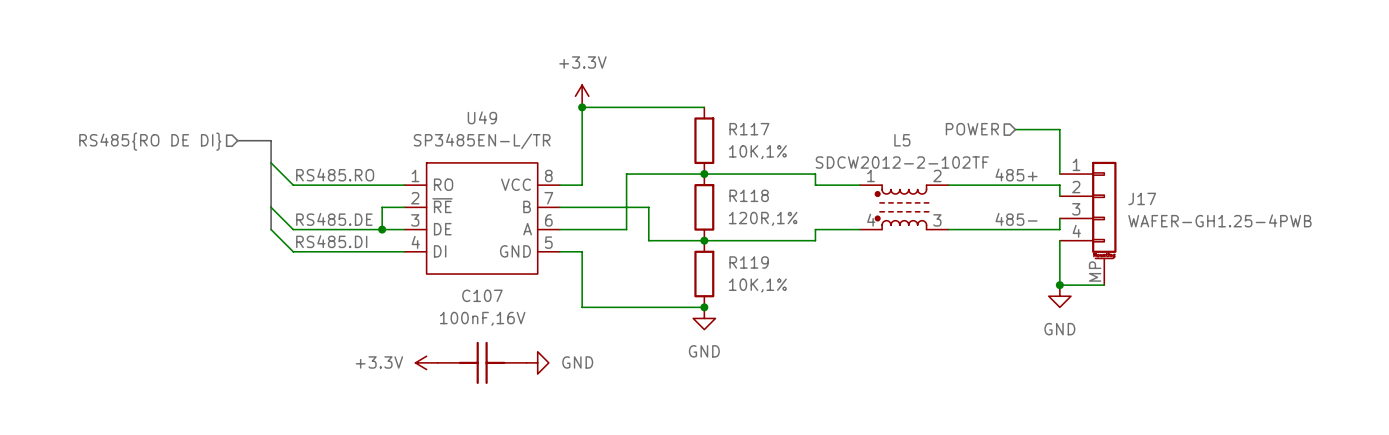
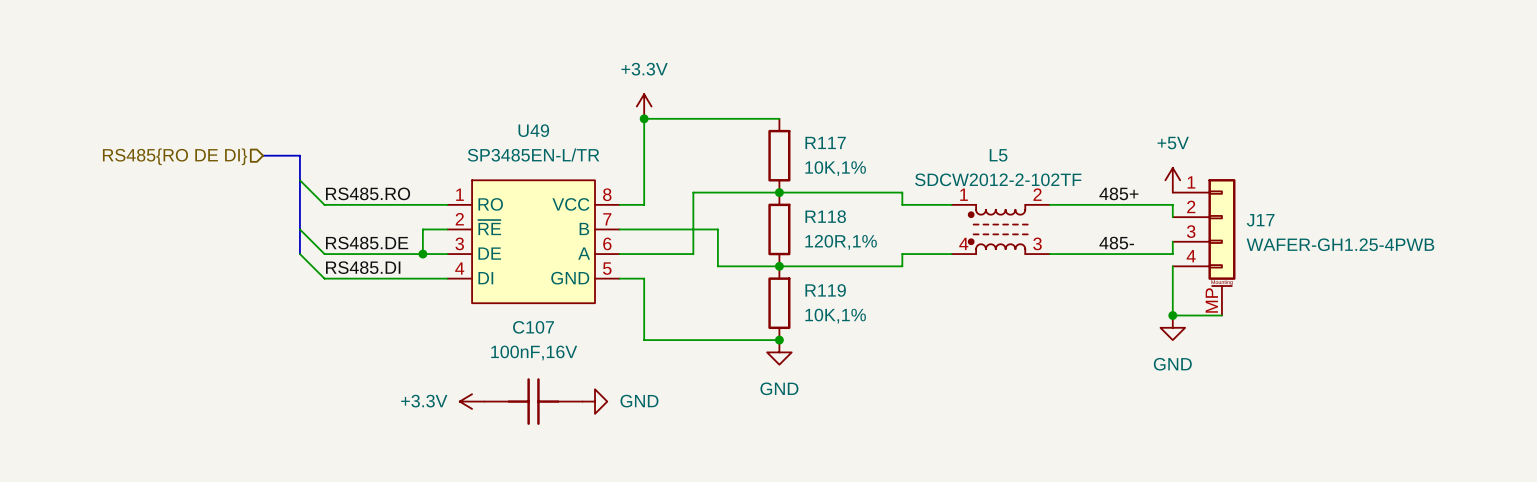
hierarchical label: POWER (972, 129) -> none
wire: (1015, 129) (1059, 129) (1059, 174) -> none
power symbol: none -> +5V (1172, 180)

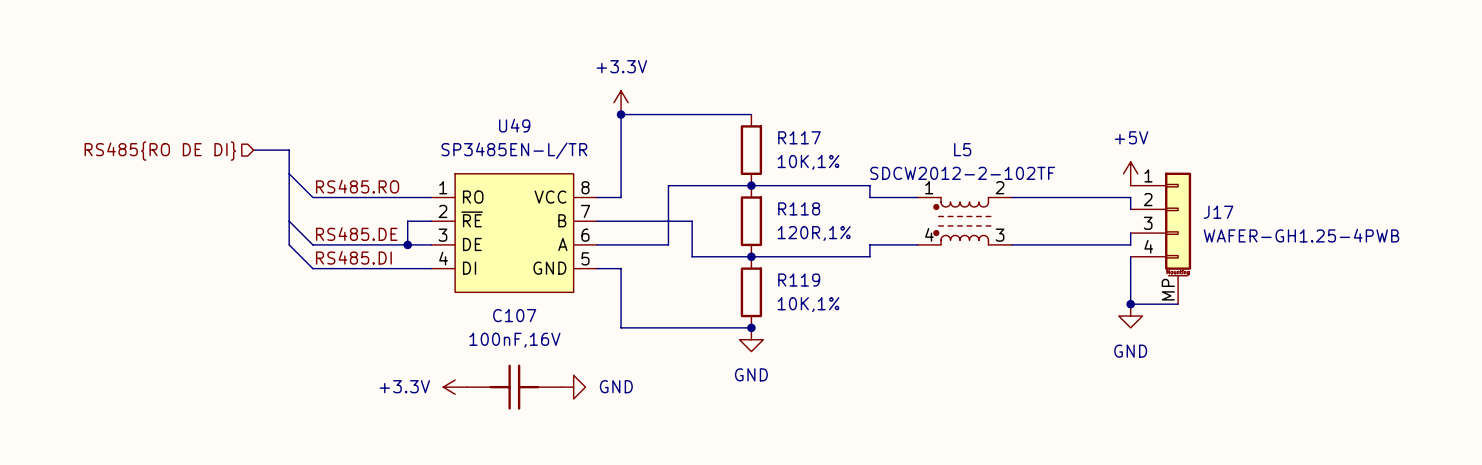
label: 485+ (1118, 193) -> none
label: 485- (1116, 243) -> none

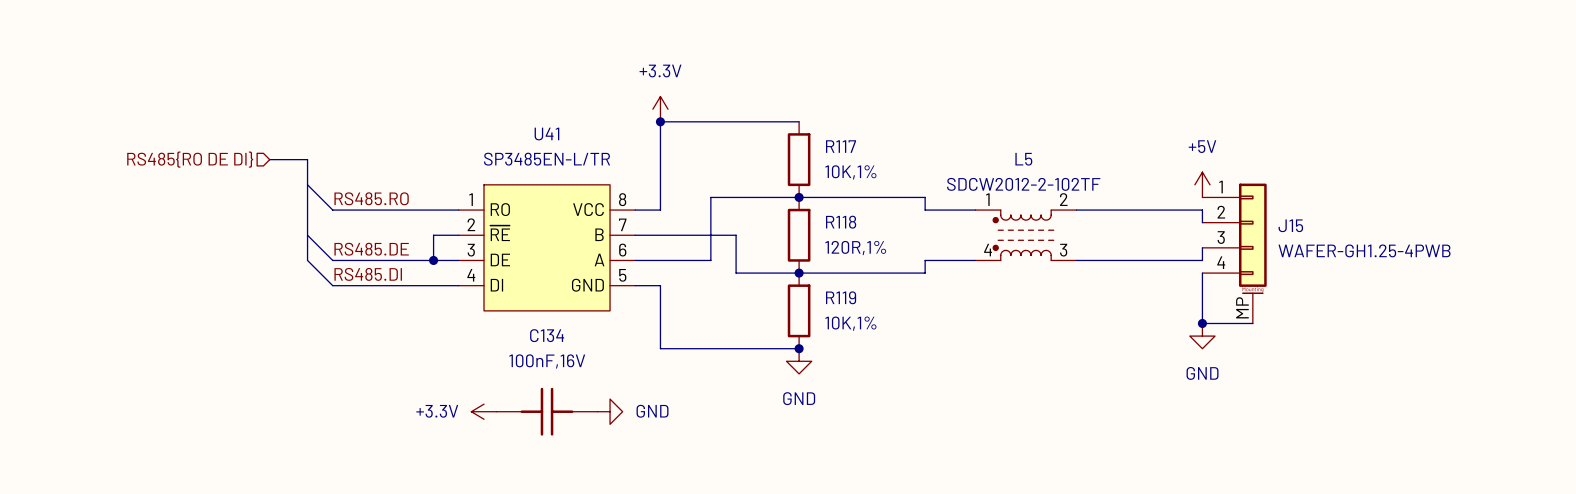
U49 name: U49 (514, 125) -> U41 (546, 134)
J17 name: J17 (1218, 212) -> J15 (1290, 225)
C107 name: C107 (514, 315) -> C134 (547, 335)

